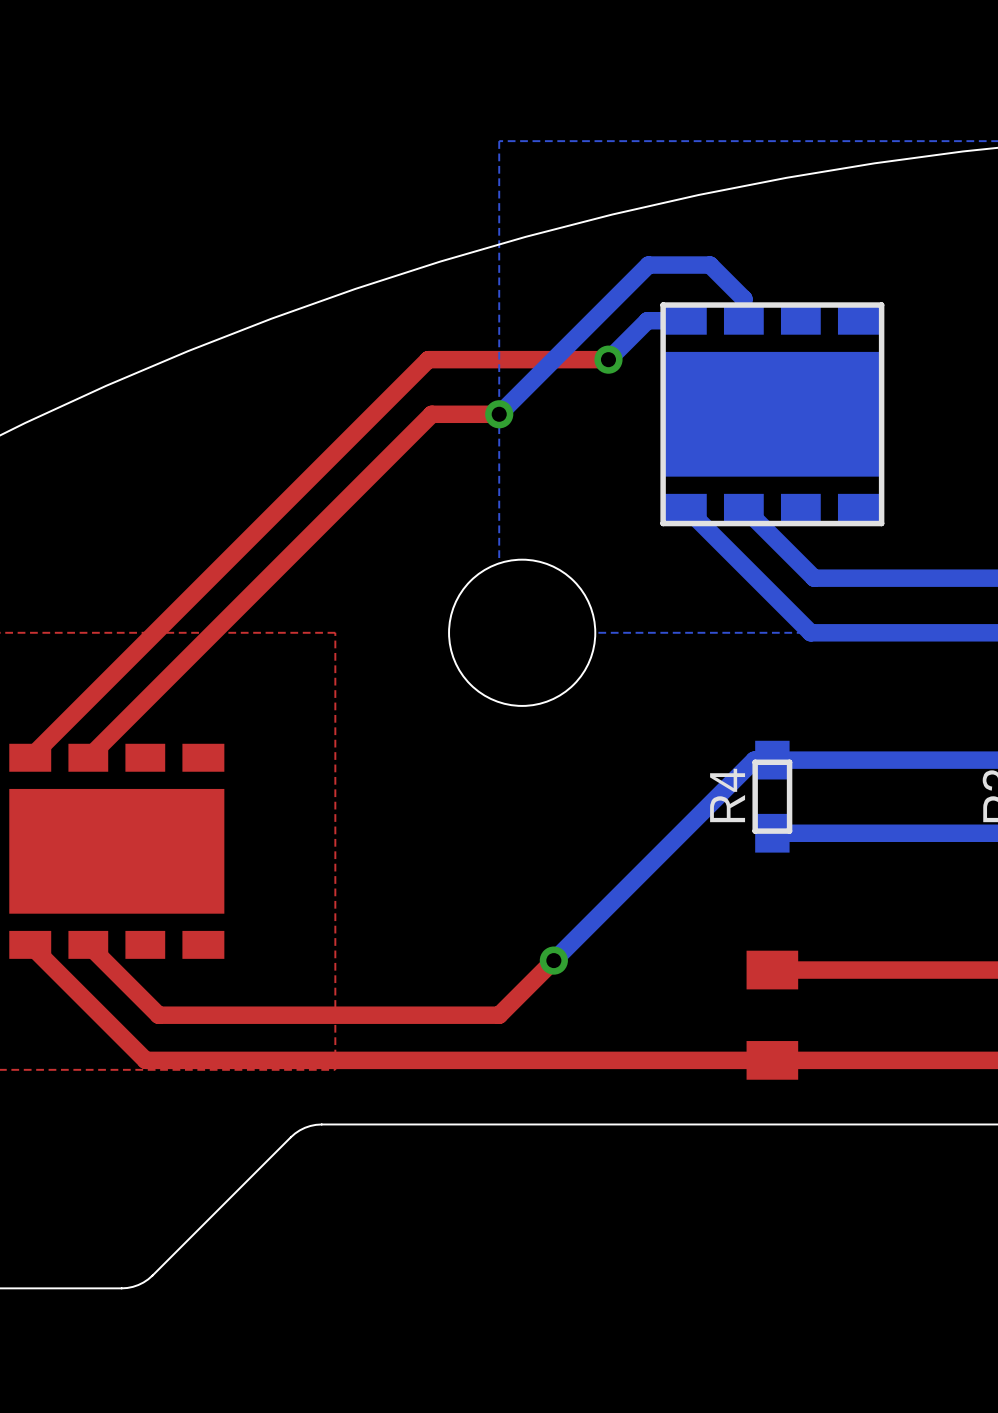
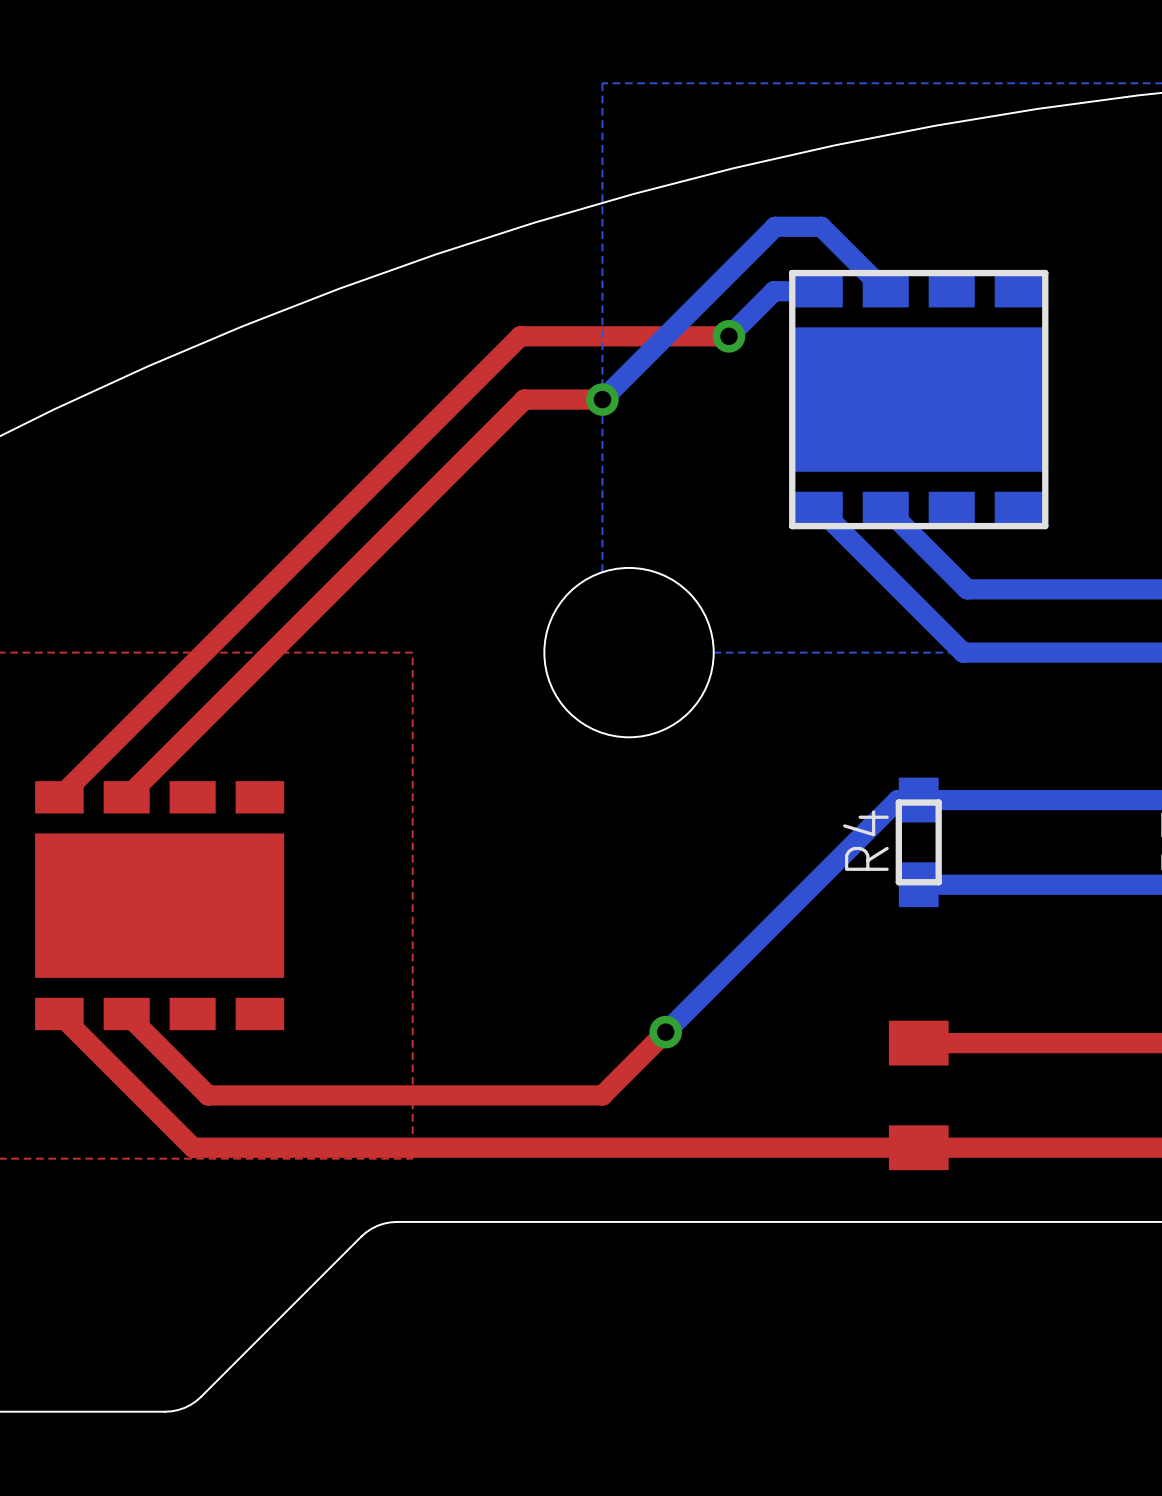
bottom track: (688, 265) (710, 265) (743, 298) (743, 320) -> (821, 226) (885, 291)

